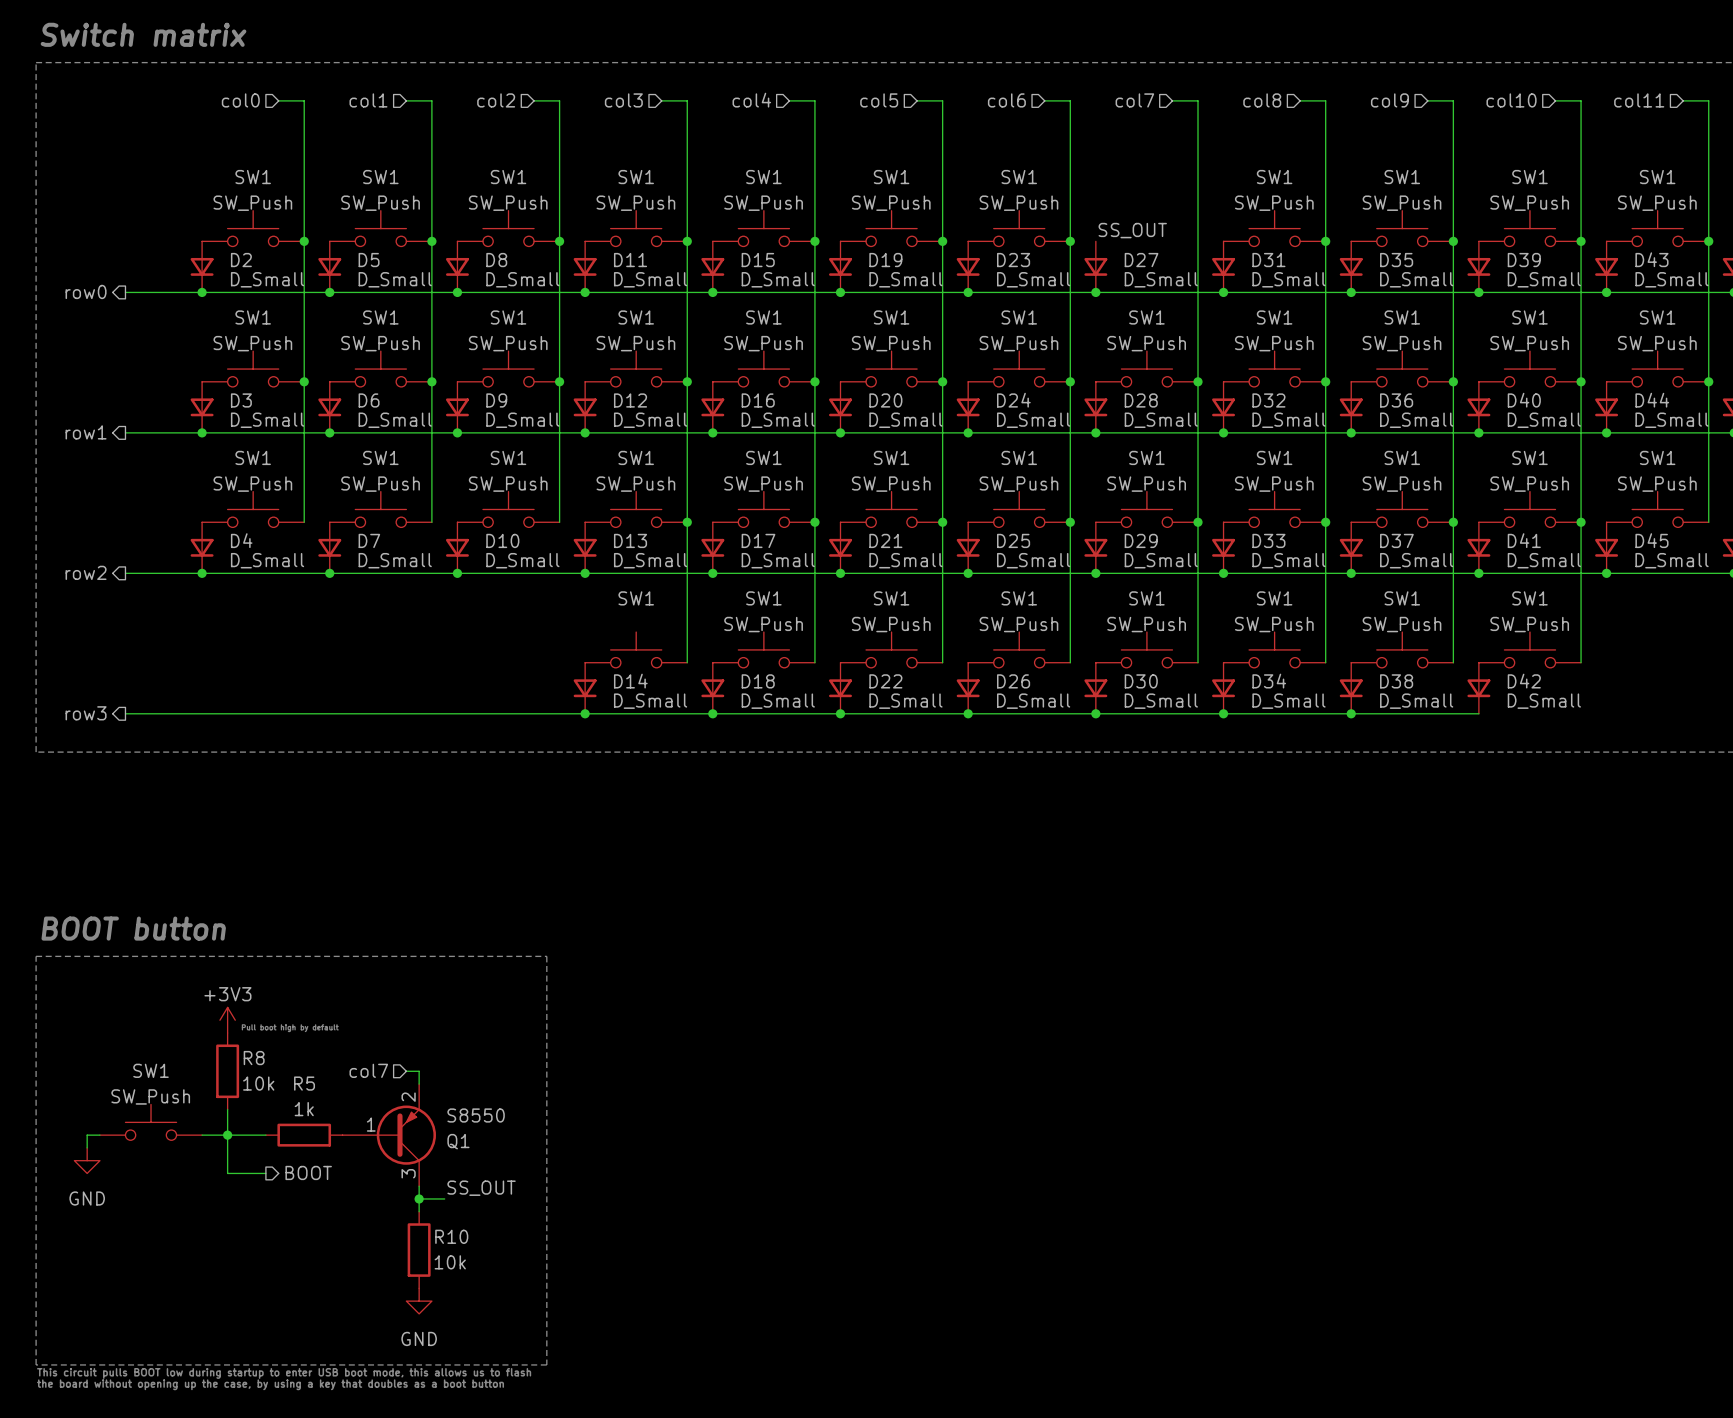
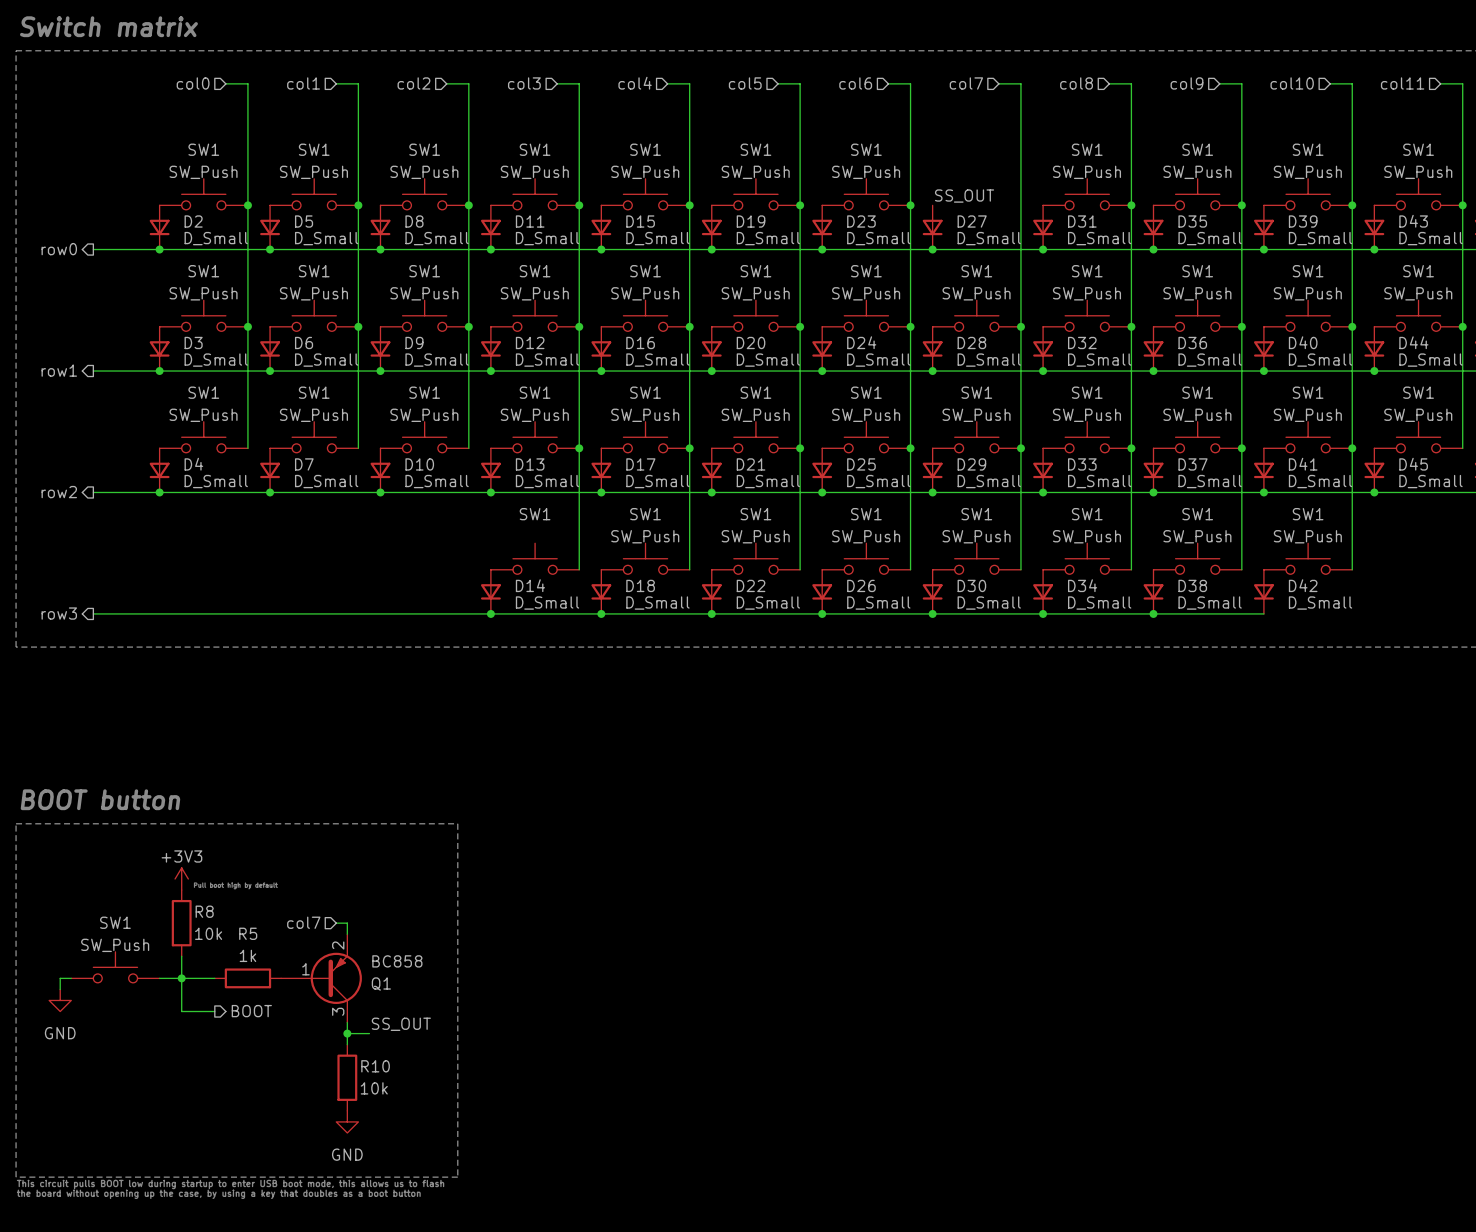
Q1 value: S8550 (476, 1115) -> BC858 (397, 961)

